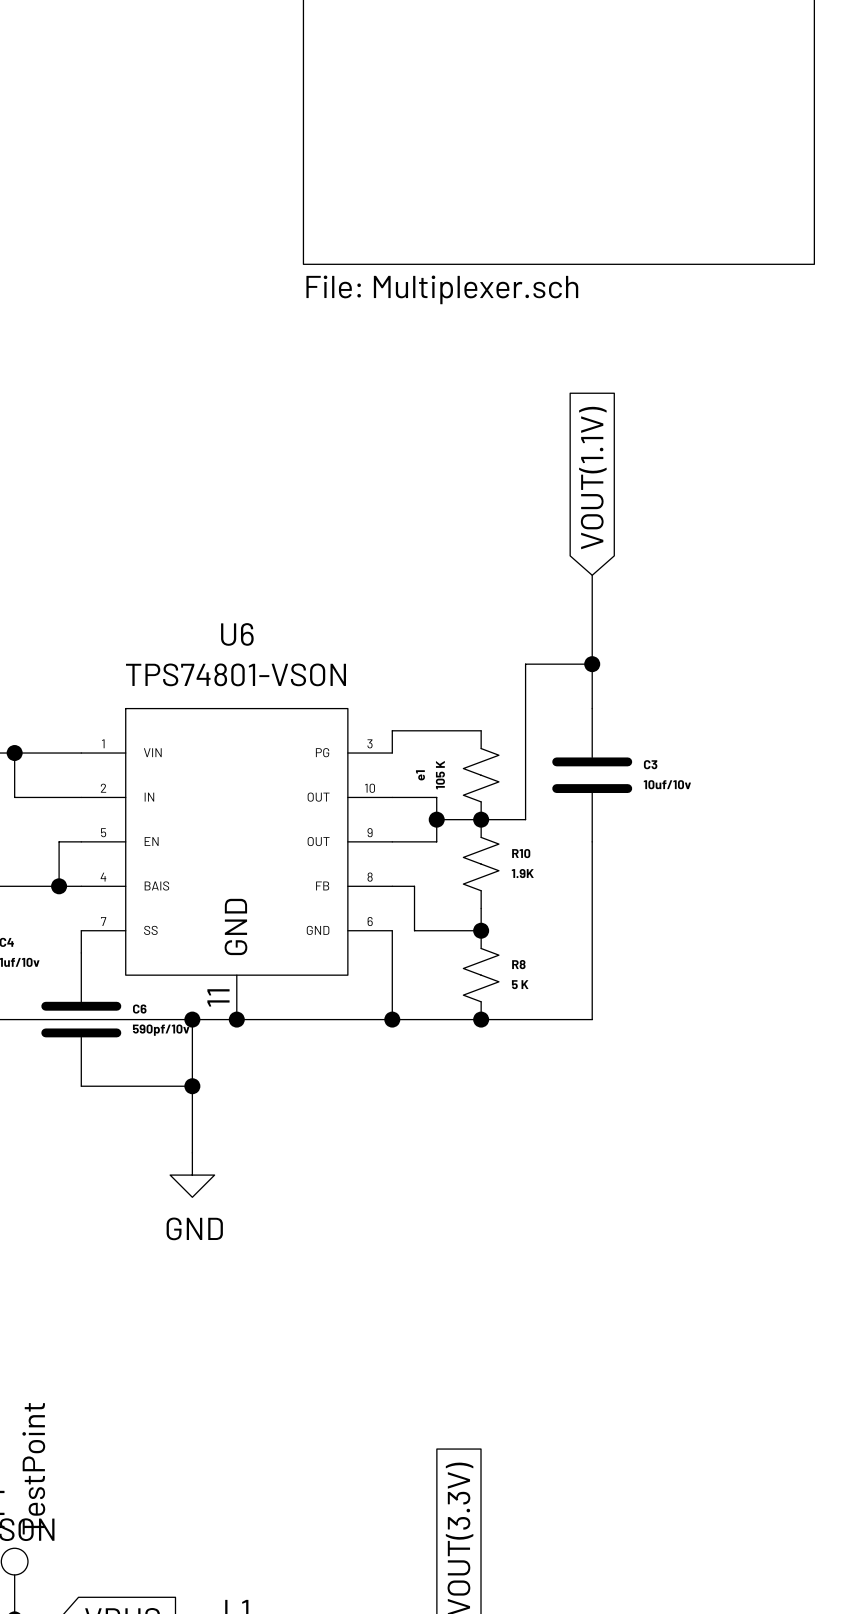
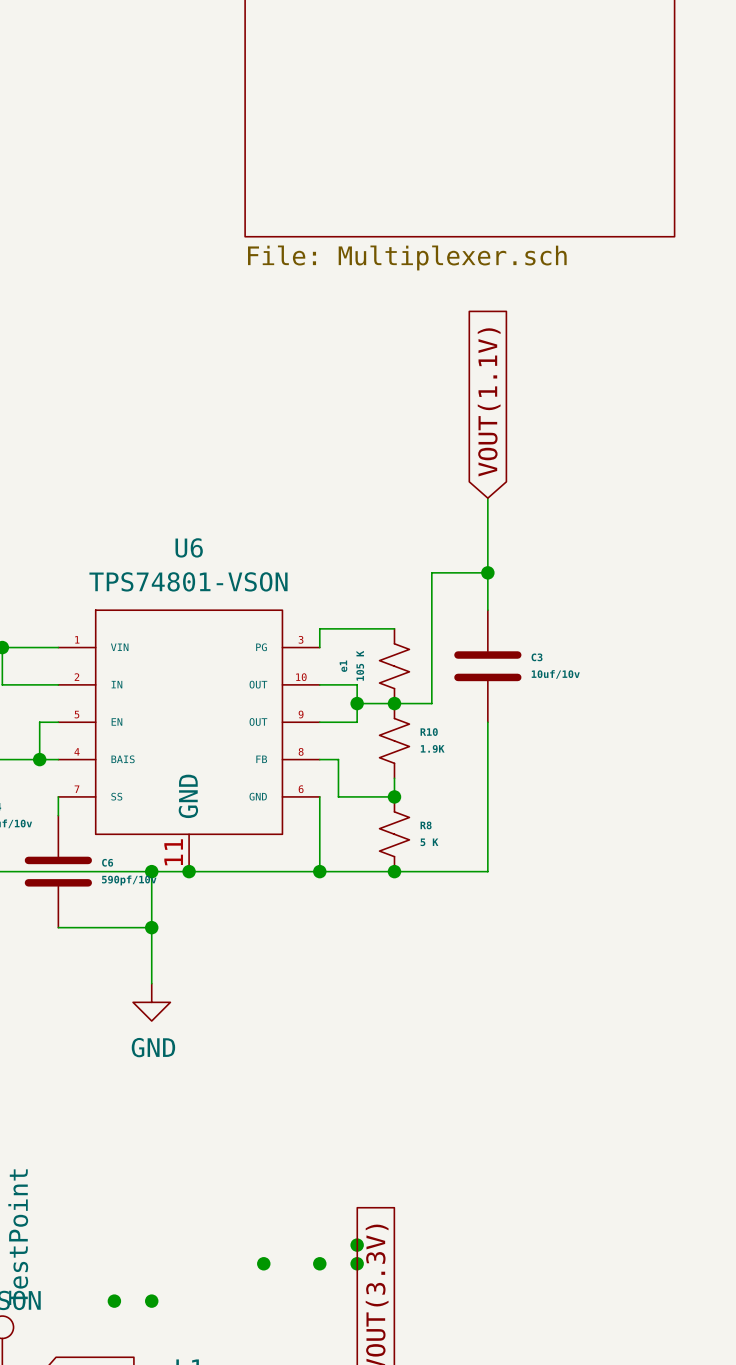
junction: none -> (357, 1245)
junction: none -> (263, 1263)
junction: none -> (319, 1263)
junction: none -> (357, 1263)
junction: none -> (114, 1301)
junction: none -> (151, 1301)

